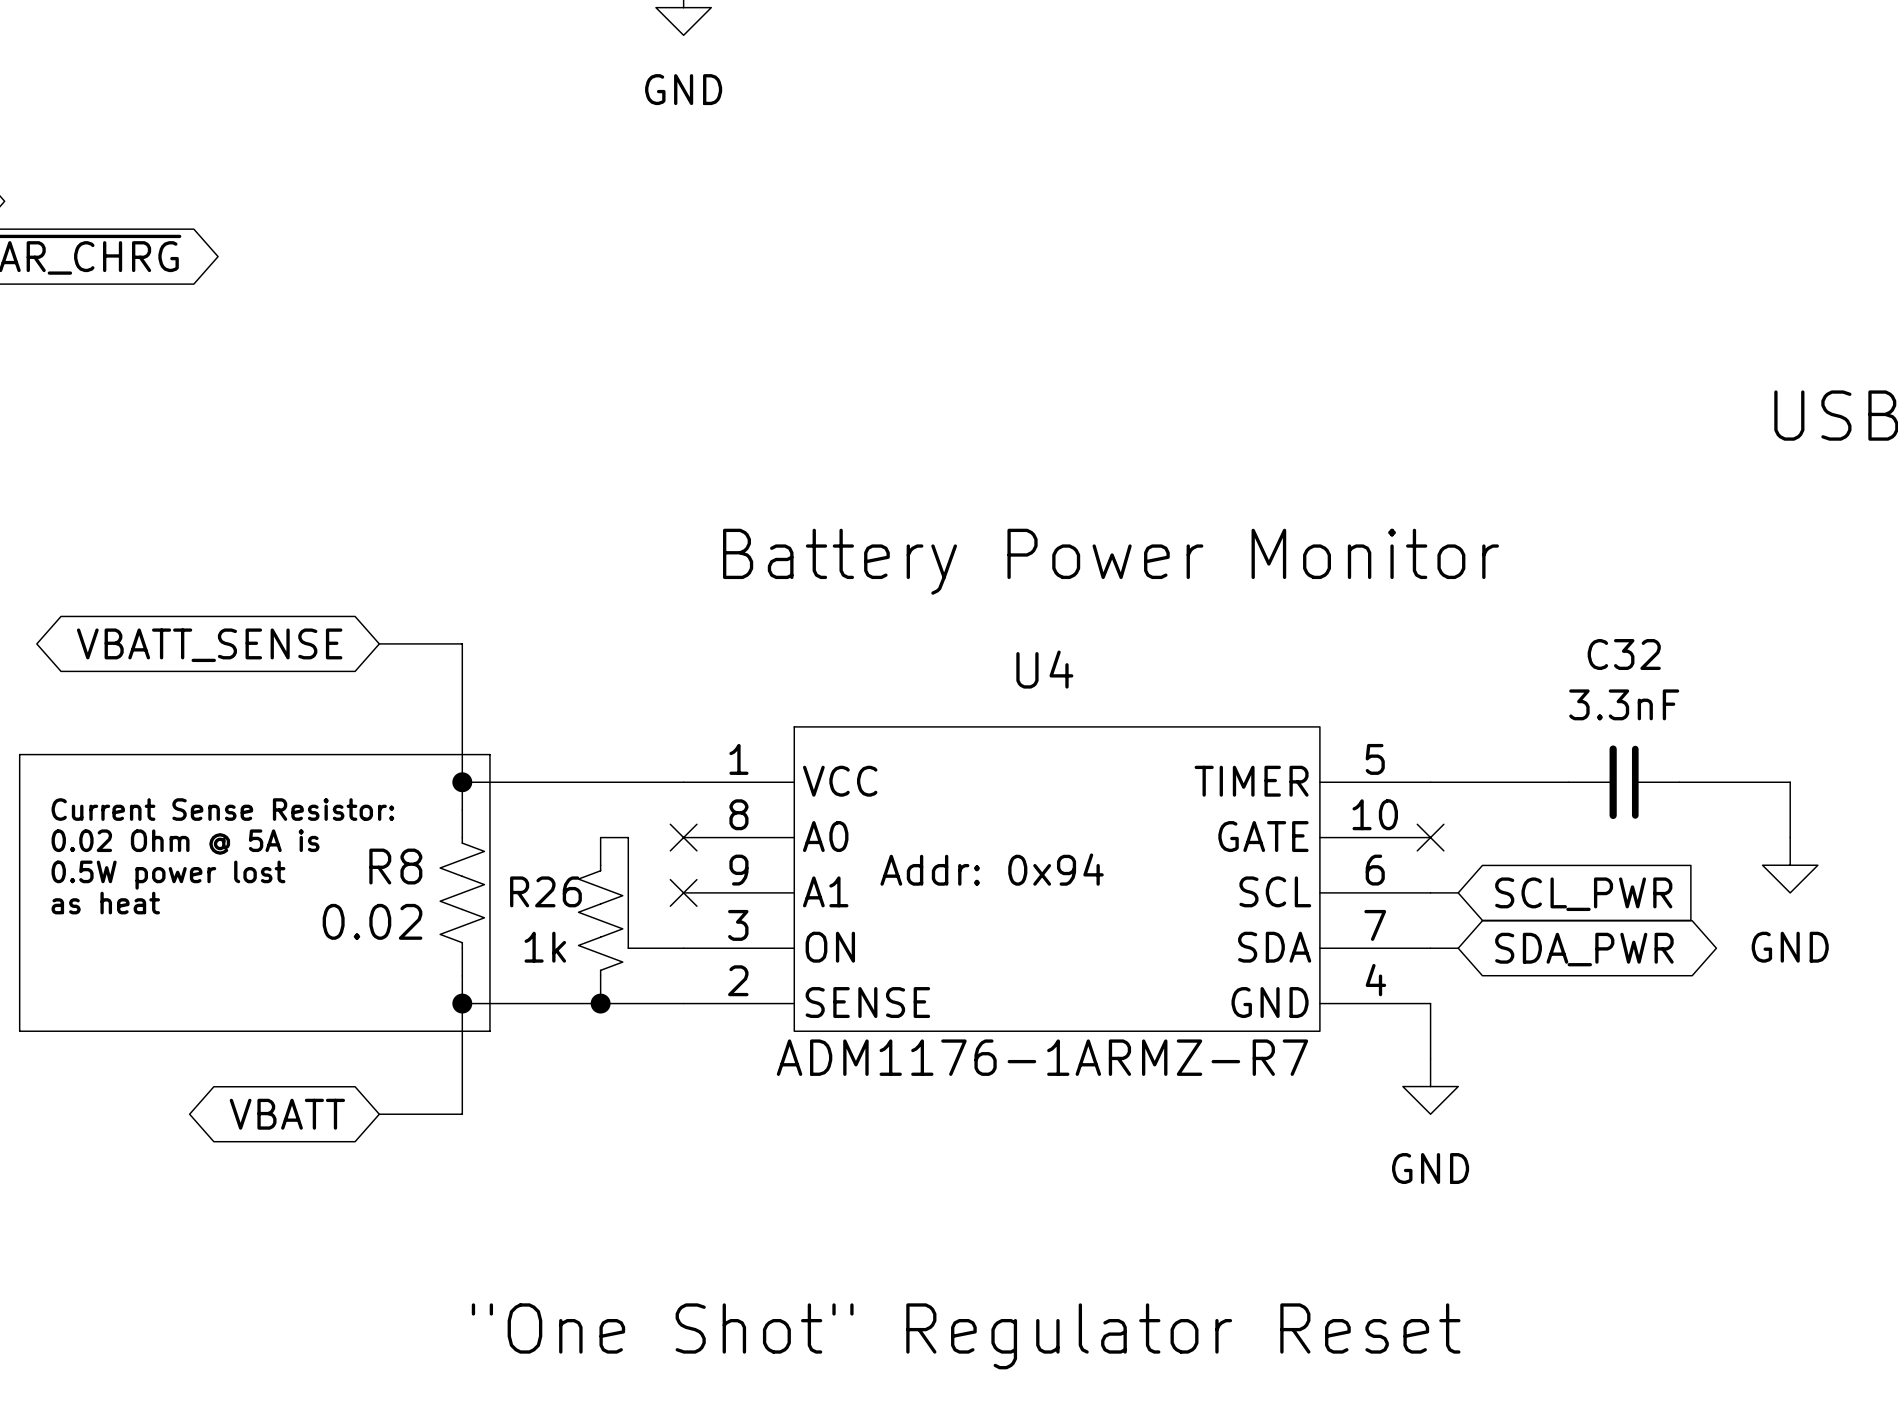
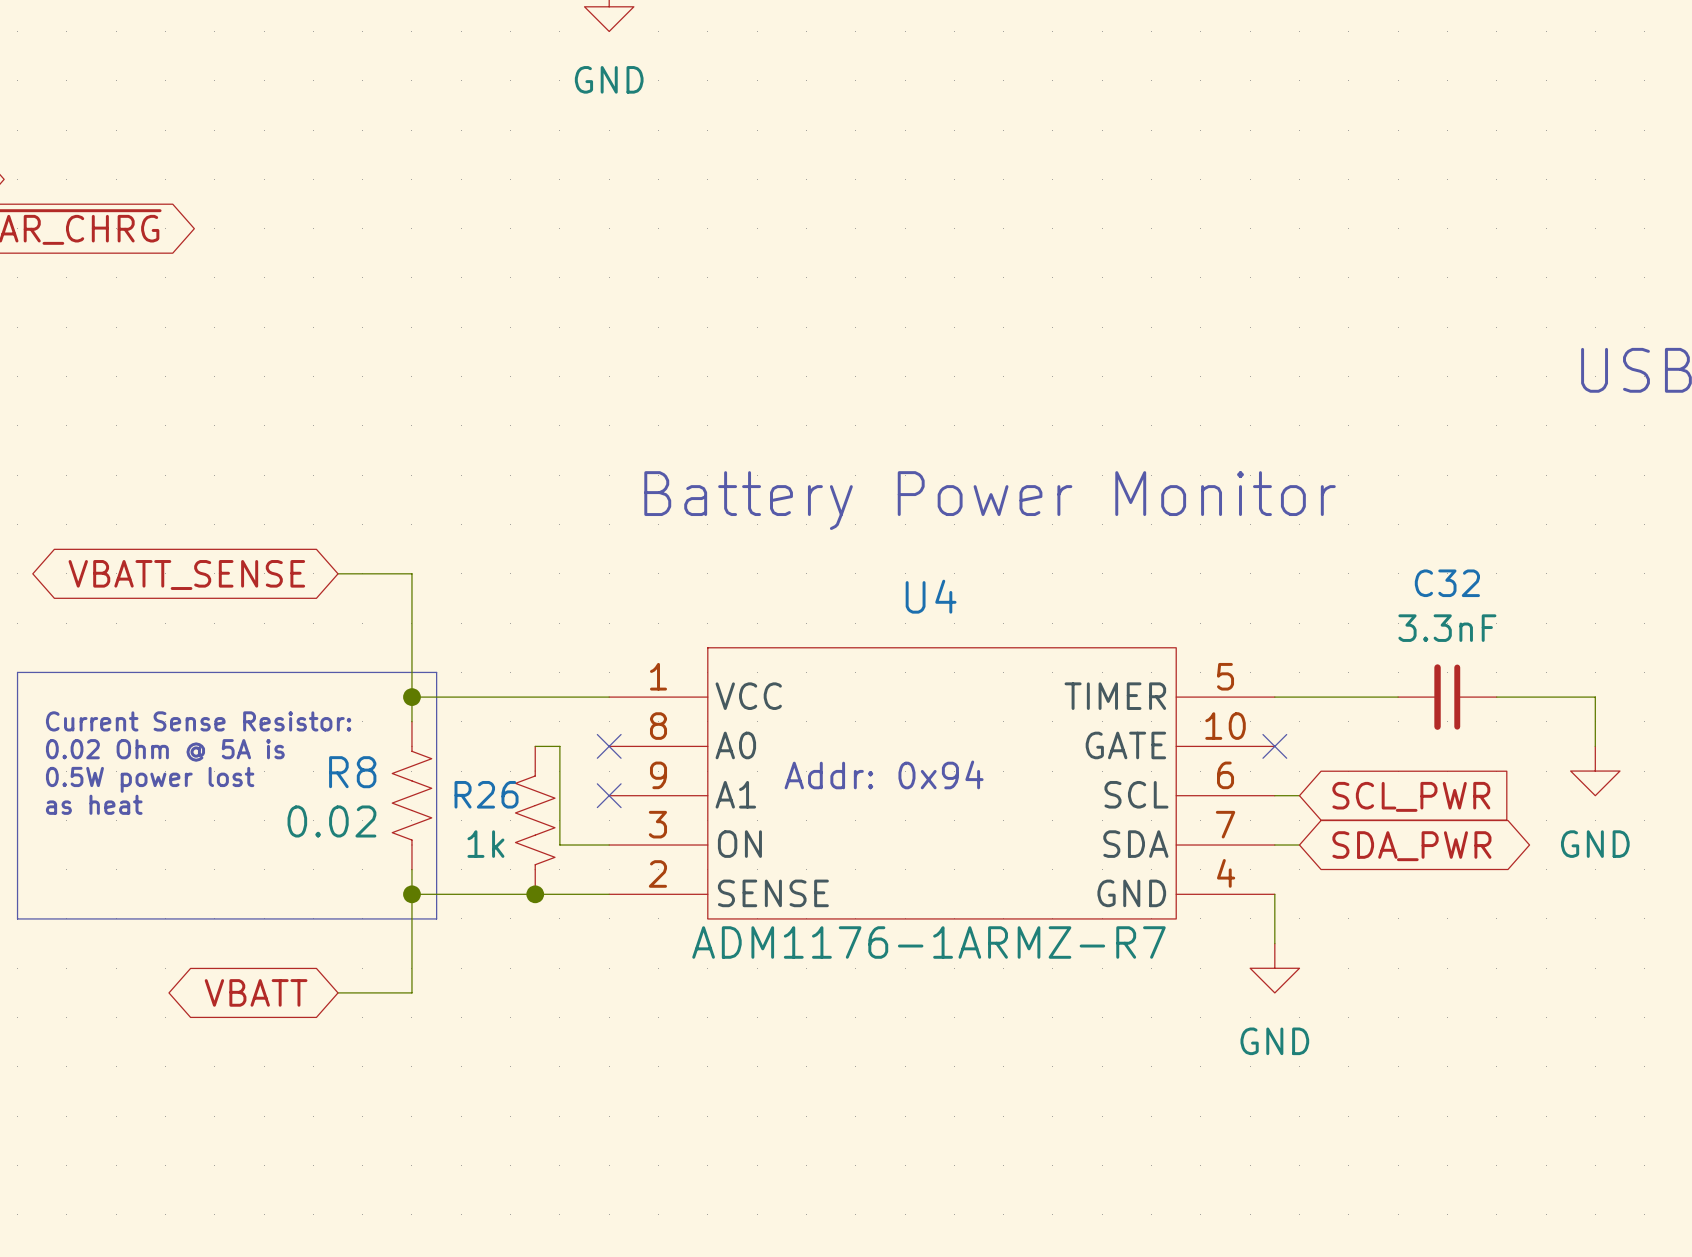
text: "One Shot" Regulator Reset (966, 1336) -> none

